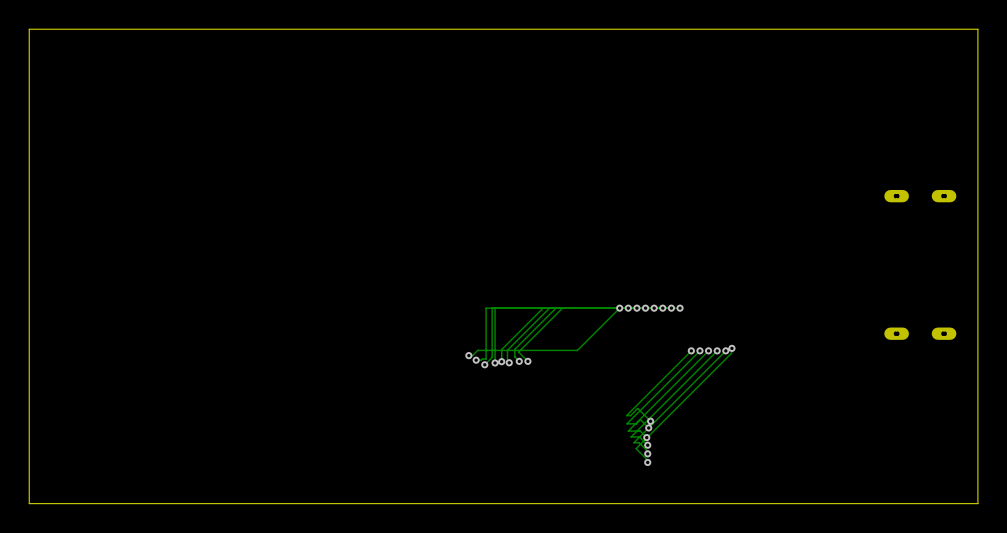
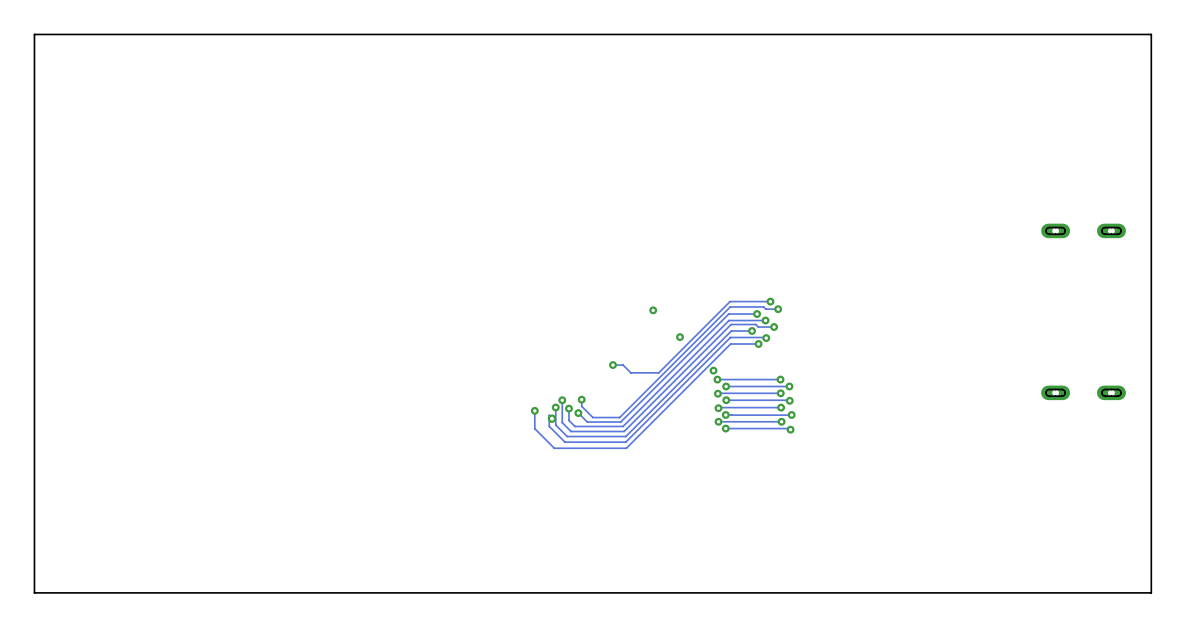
track: none -> (770, 301) (730, 301) (658, 372) (630, 372) (623, 365) (612, 365)
via: none -> (770, 301)
track: none -> (778, 309) (765, 309) (763, 306) (730, 306) (619, 417) (592, 417) (581, 406) (581, 399)
via: none -> (778, 309)
via: none -> (653, 310)
track: none -> (757, 314) (728, 314) (620, 422) (587, 422) (578, 413)
via: none -> (757, 314)
track: none -> (765, 320) (728, 320) (623, 426) (575, 426) (568, 420) (568, 408)
via: none -> (765, 320)
track: none -> (774, 327) (731, 324) (624, 431) (571, 431) (562, 422) (562, 400)
via: none -> (774, 327)
track: none -> (752, 331) (731, 331) (625, 436) (567, 436) (555, 425) (555, 407)
via: none -> (752, 331)
via: none -> (680, 337)
track: none -> (766, 338) (730, 337) (625, 442) (565, 442) (549, 426) (549, 415)
via: none -> (766, 338)
track: none -> (758, 344) (730, 344) (626, 448) (554, 448) (534, 428) (534, 410)
via: none -> (758, 344)
track: (492, 308) (492, 357) (484, 364) -> none
track: (495, 308) (495, 362) -> none
track: (543, 308) (501, 349) (501, 361) -> none
track: (549, 308) (507, 350) (507, 360) (509, 362) -> none
track: (556, 308) (514, 349) (514, 356) (519, 361) -> none
track: (562, 308) (518, 352) (527, 361) -> none
track: (619, 308) (577, 350) (477, 350) (472, 355) (468, 355) -> none
via: (619, 308) -> none
via: (628, 308) -> none
via: (636, 308) -> none
via: (645, 308) -> none
via: (654, 308) -> none
via: (662, 308) -> none
via: (671, 308) -> none
track: (680, 308) (486, 308) (486, 359) (476, 360) -> none
via: (680, 308) -> none
via: none -> (612, 365)
via: none -> (713, 370)
via: none -> (717, 379)
track: none -> (780, 379) (717, 379)
via: none -> (780, 379)
via: none -> (726, 386)
track: none -> (789, 386) (726, 386)
via: none -> (789, 386)
via: none -> (717, 393)
track: none -> (780, 393) (717, 393)
via: none -> (780, 393)
via: none -> (562, 400)
via: none -> (581, 399)
track: none -> (726, 400) (789, 400)
via: none -> (726, 400)
via: none -> (789, 400)
via: none -> (555, 407)
via: none -> (718, 408)
track: none -> (781, 407) (718, 408)
via: none -> (781, 407)
via: none -> (568, 408)
via: none -> (534, 410)
track: (731, 348) (731, 353) (636, 448) (647, 462) -> none
via: (731, 348) -> none
via: none -> (578, 413)
track: (691, 350) (626, 415) (630, 415) (637, 408) (650, 421) -> none
via: (691, 350) -> none
track: (699, 350) (626, 423) (636, 423) (640, 419) (648, 427) -> none
via: (699, 350) -> none
track: (708, 350) (628, 431) (639, 430) (646, 437) -> none
via: (708, 350) -> none
track: (717, 350) (631, 436) (639, 436) (647, 445) -> none
via: (717, 350) -> none
track: (725, 350) (633, 442) (639, 442) (647, 451) (647, 453) -> none
via: (725, 350) -> none
via: none -> (725, 414)
track: none -> (731, 414) (725, 414)
track: none -> (791, 415) (731, 415)
via: none -> (791, 414)
via: none -> (718, 421)
track: none -> (781, 421) (718, 421)
via: none -> (781, 421)
via: (476, 360) -> none
via: (501, 361) -> none
via: (519, 361) -> none
via: (527, 361) -> none
via: (495, 362) -> none
via: (509, 362) -> none
via: (484, 364) -> none
track: none -> (725, 428) (790, 429)
via: none -> (725, 428)
via: none -> (790, 429)
via: (650, 421) -> none
via: (648, 427) -> none
via: (646, 437) -> none
via: (647, 445) -> none
via: (647, 453) -> none
via: (647, 462) -> none

